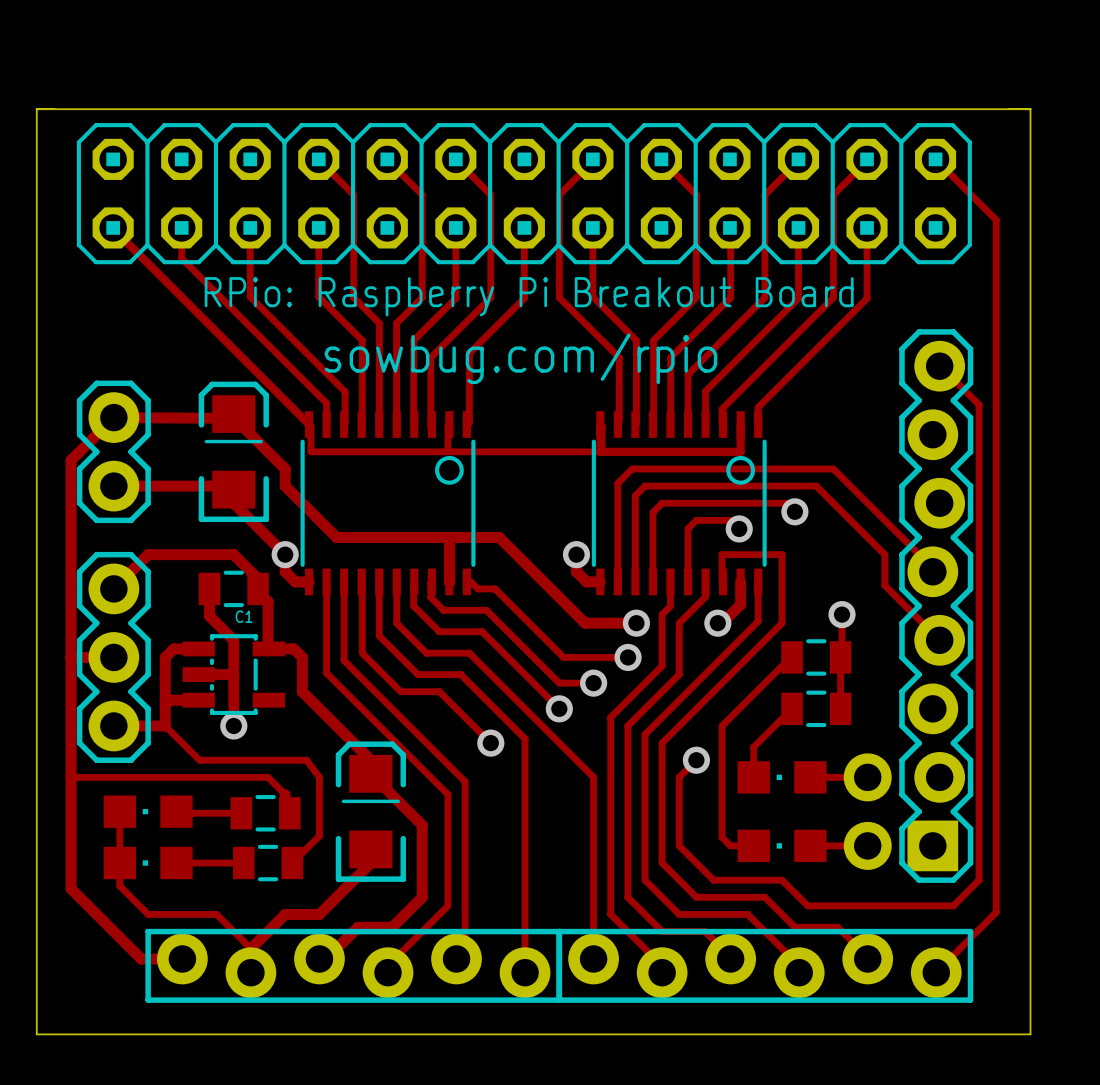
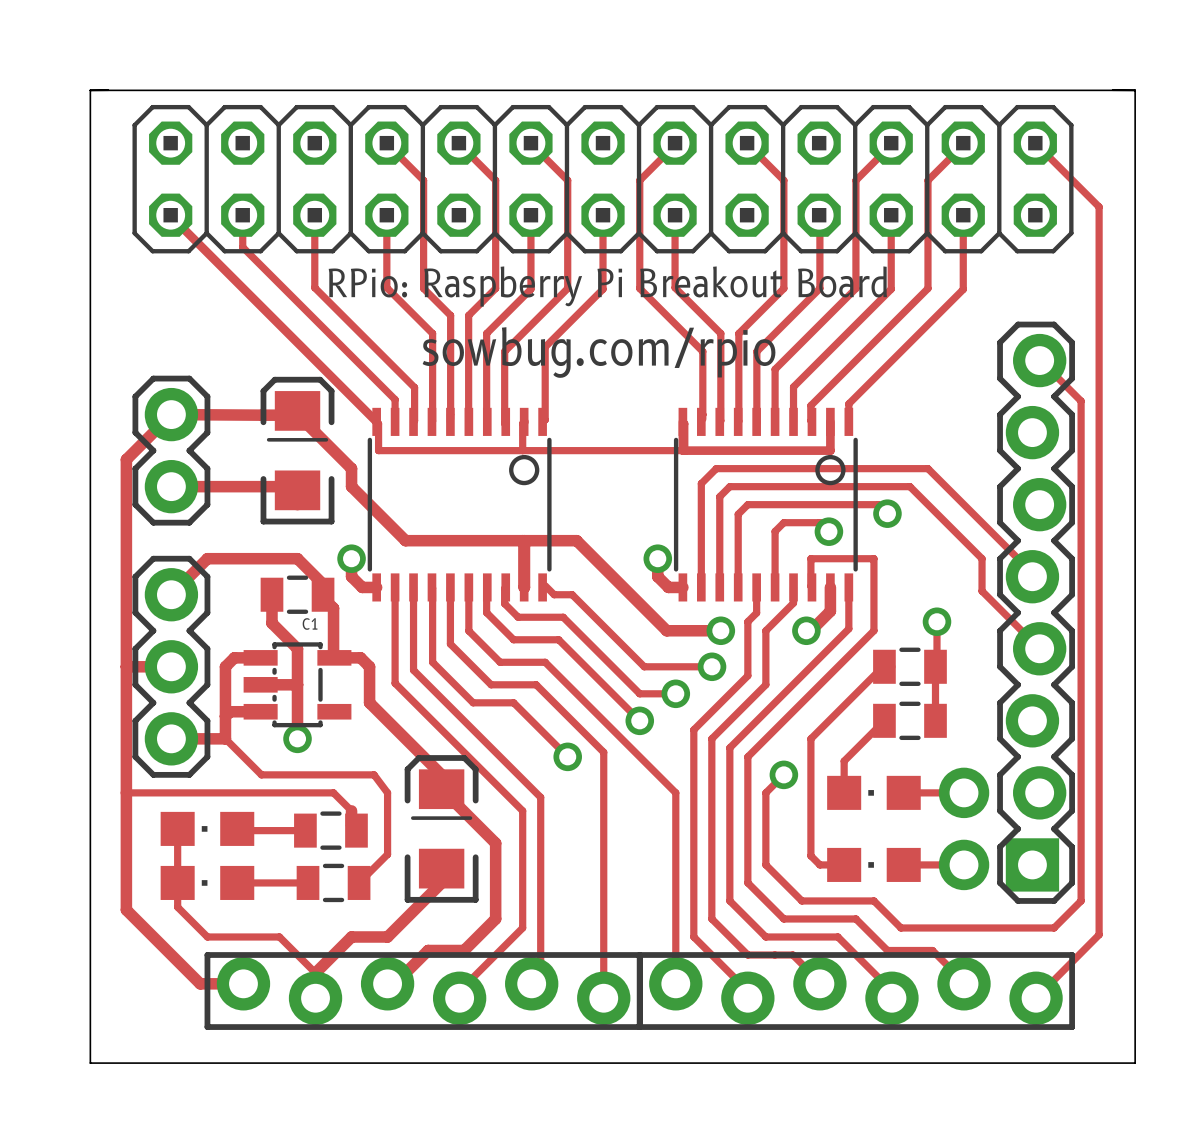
track: (233, 503) (285, 554) -> none

